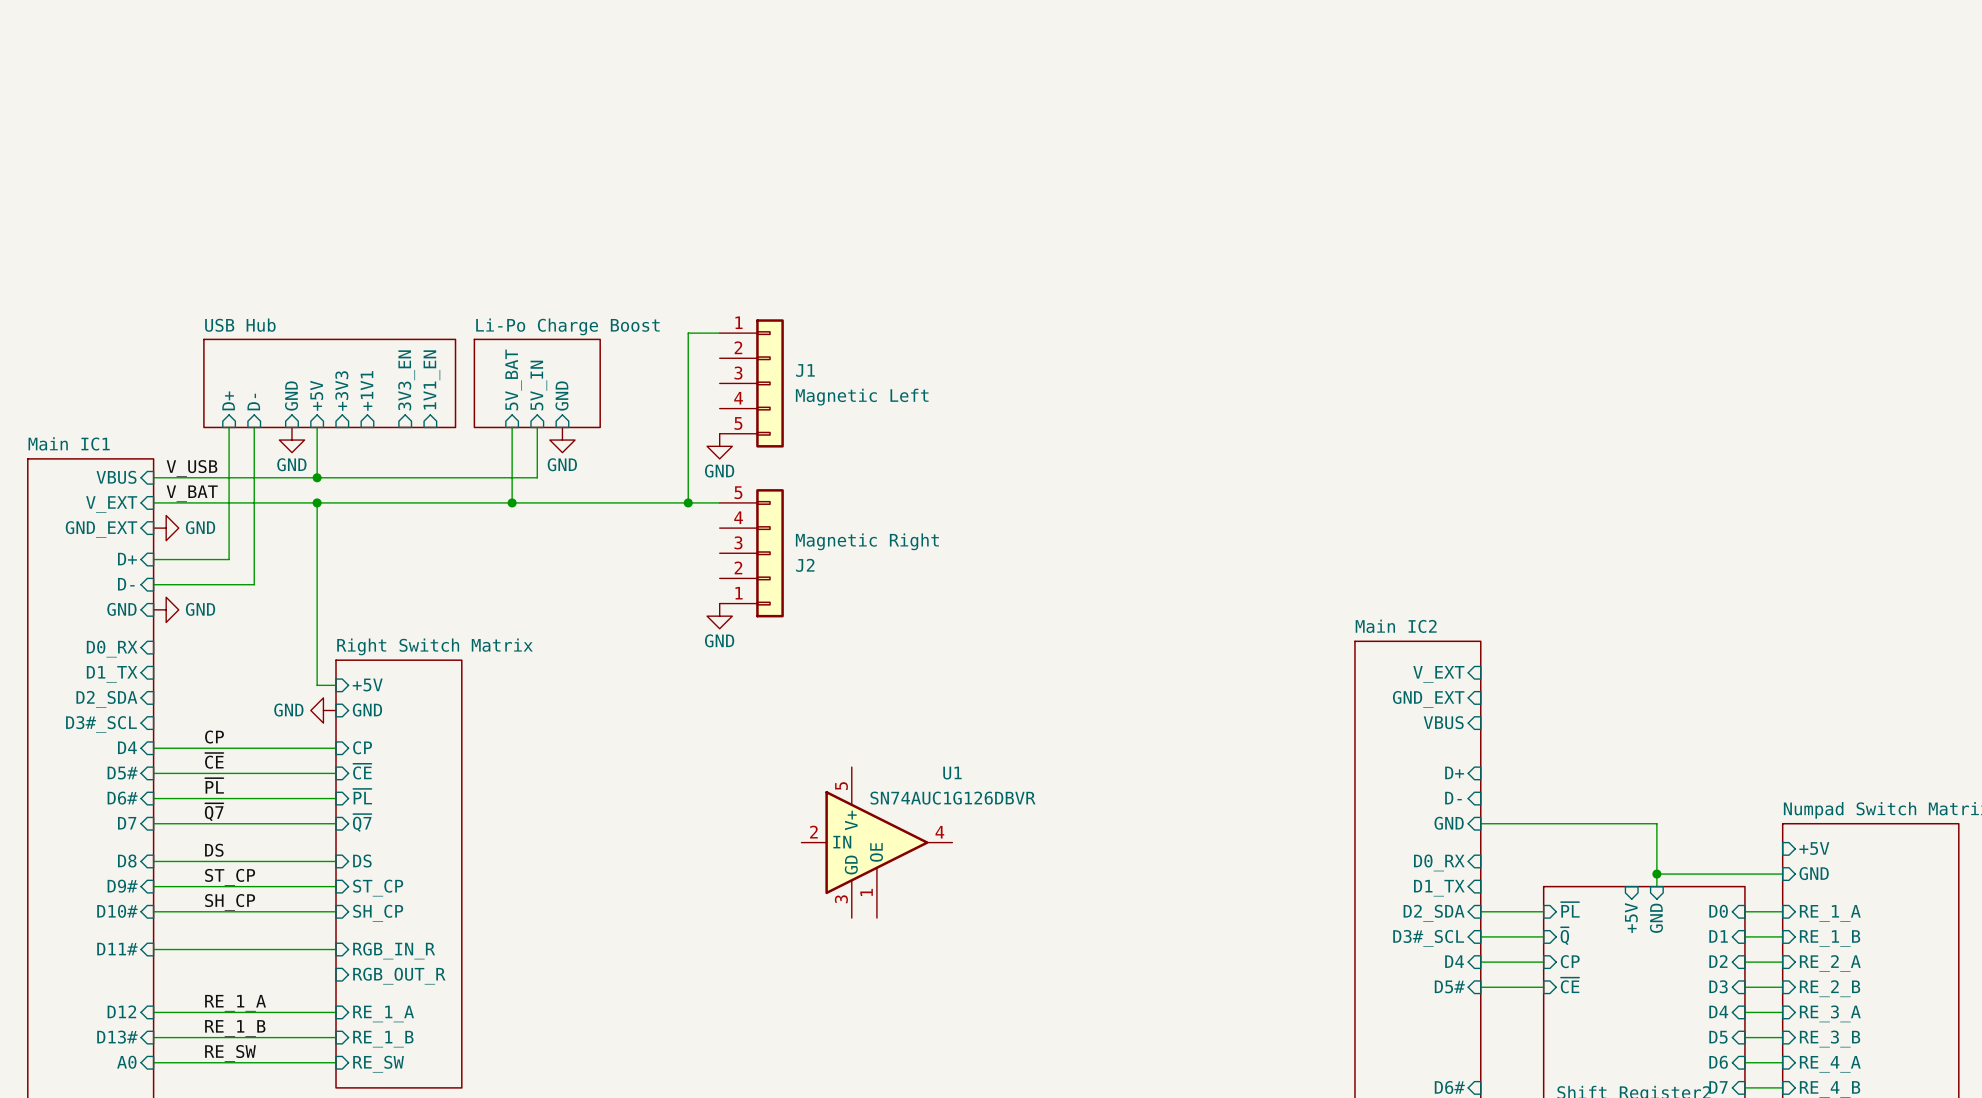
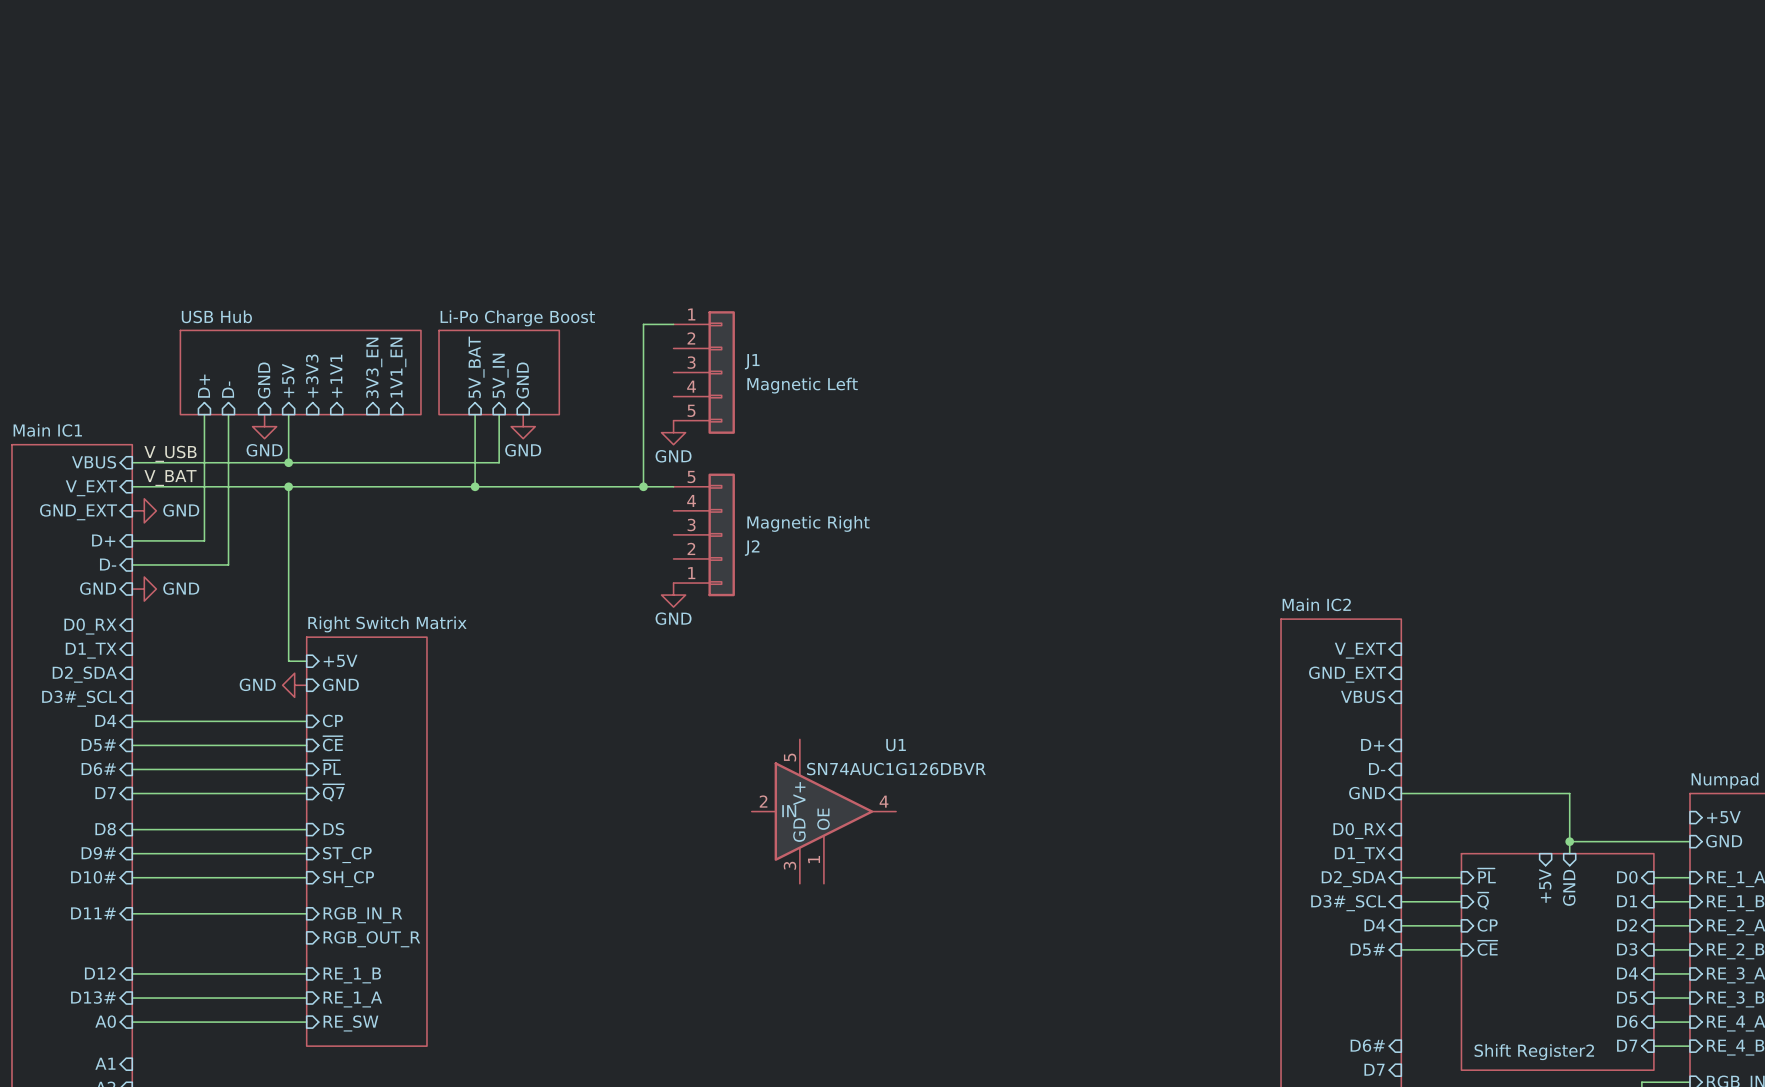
label: CP (214, 737) -> none
label: ~{CE} (214, 760) -> none
label: ~{PL} (214, 785) -> none
label: ~{Q7} (214, 812) -> none
label: DS (214, 850) -> none
label: ST_CP (230, 877) -> none
label: SH_CP (230, 902) -> none
label: RE_1_A (235, 1003) -> none
sheet pin: RE_1_A (383, 1013) -> RE_1_B (352, 975)
label: RE_1_B (235, 1028) -> none
sheet pin: RE_1_B (383, 1039) -> RE_1_A (352, 999)
label: RE_SW (230, 1053) -> none

